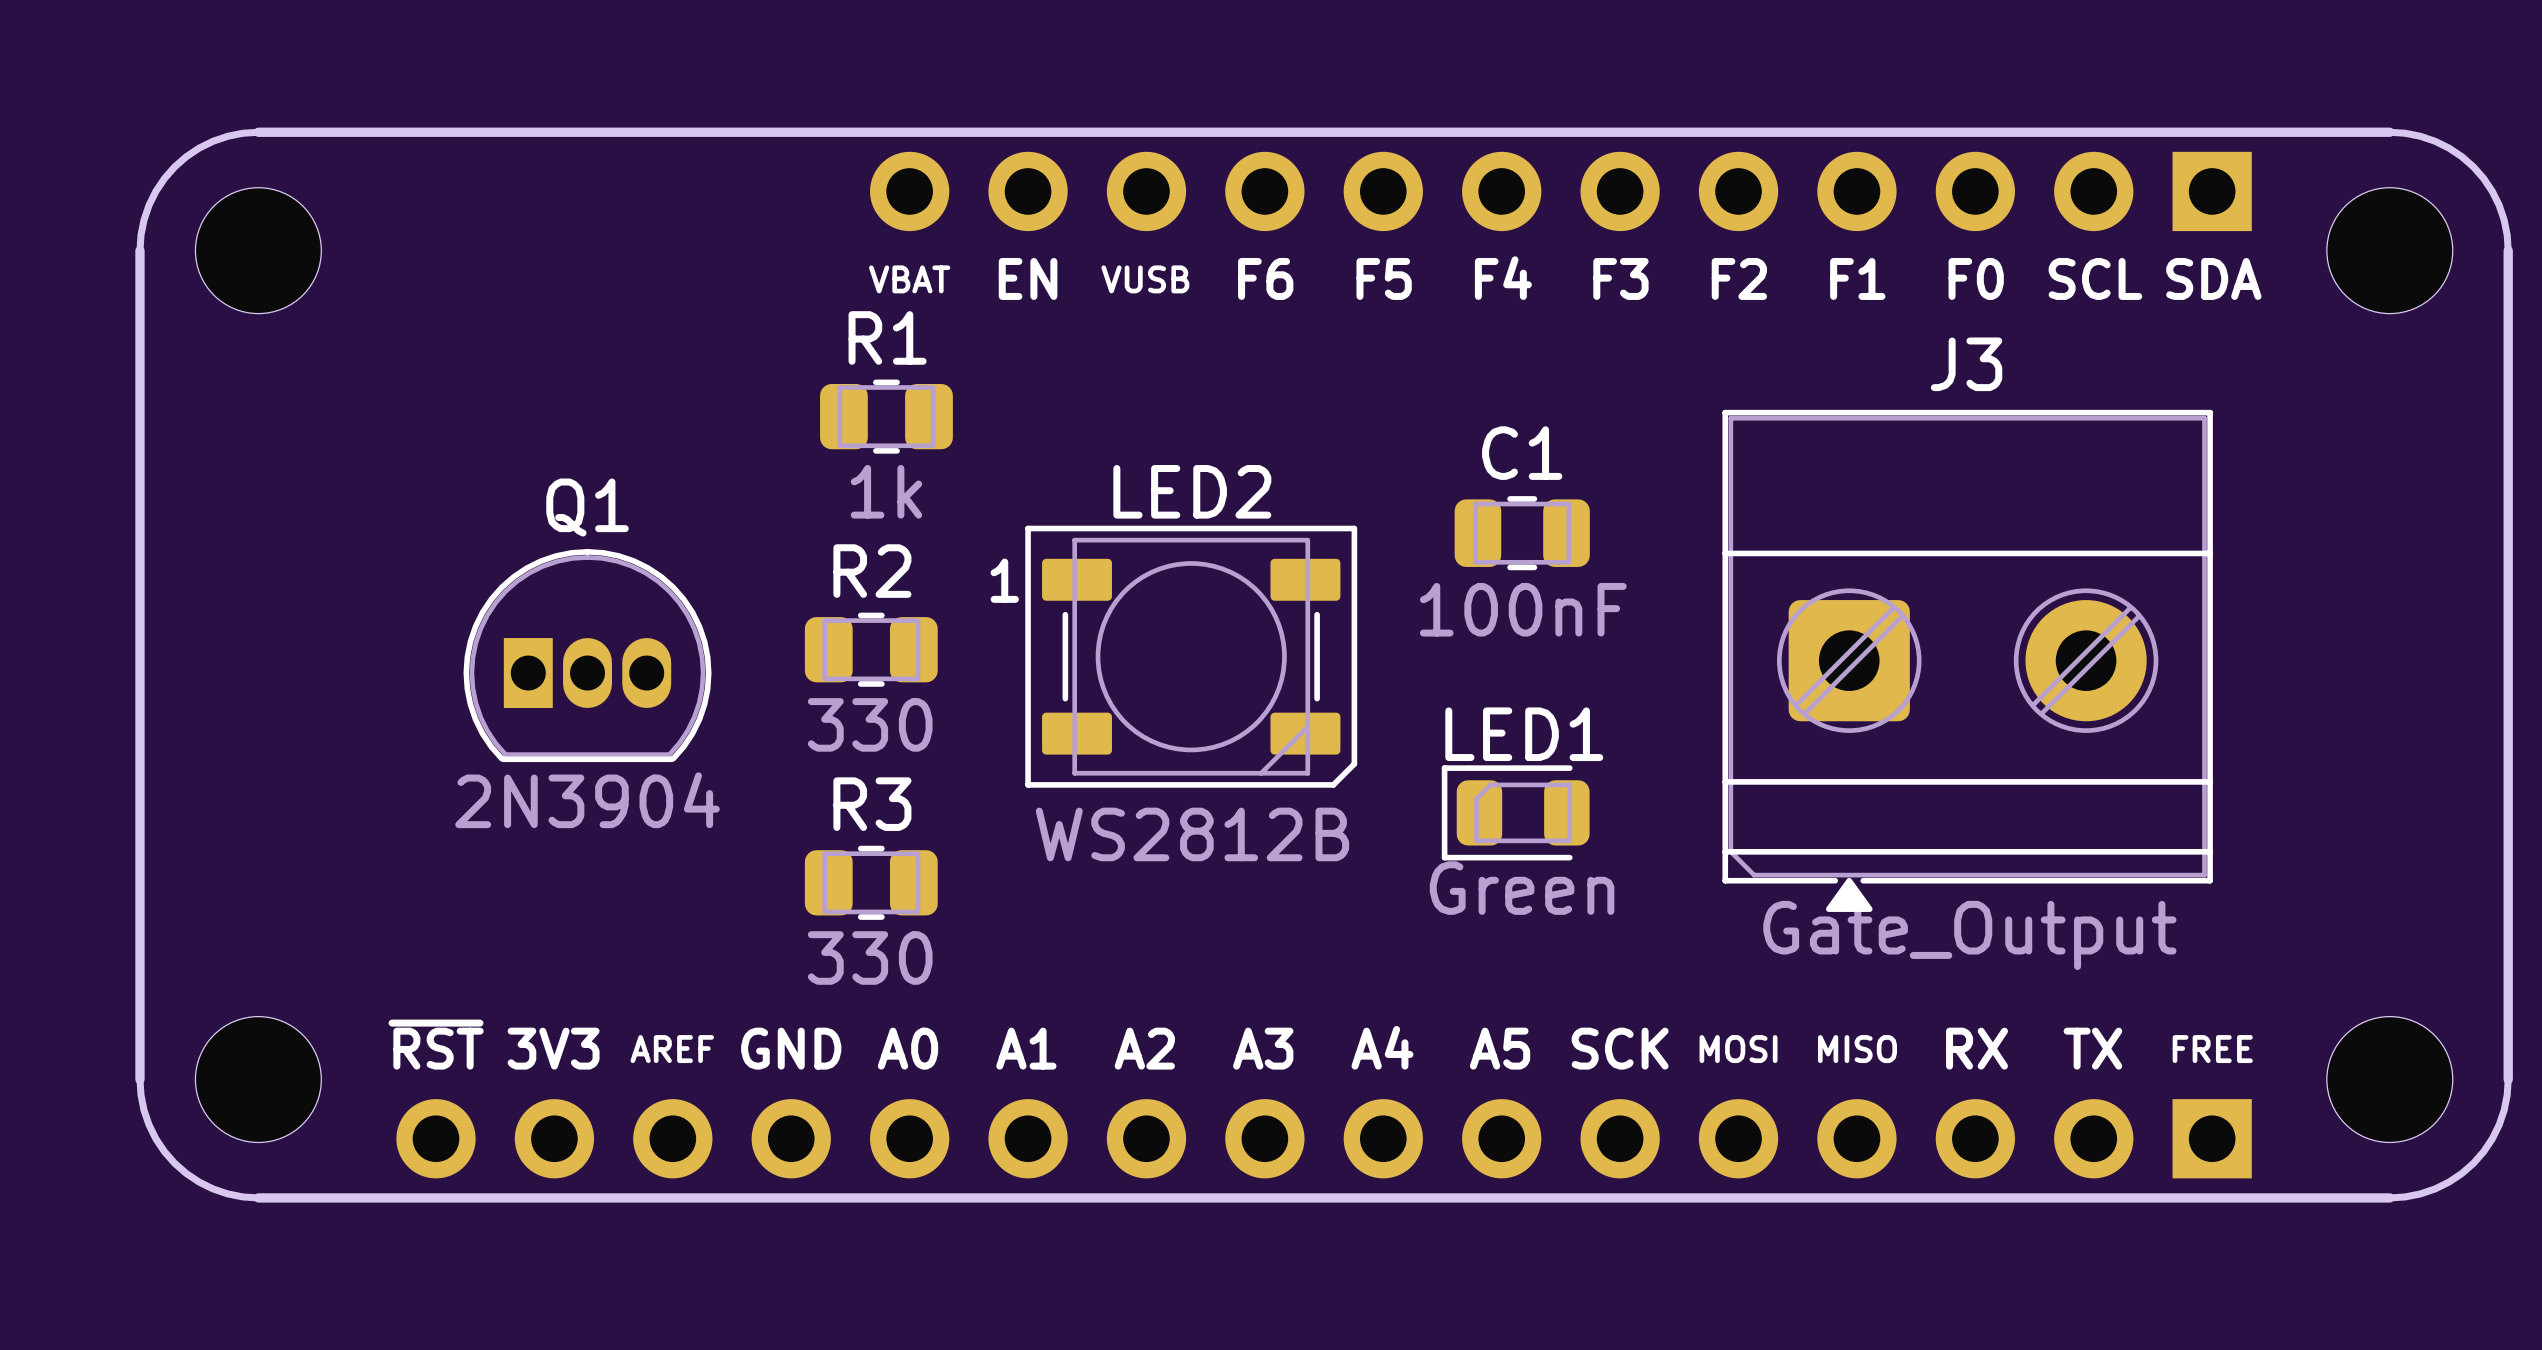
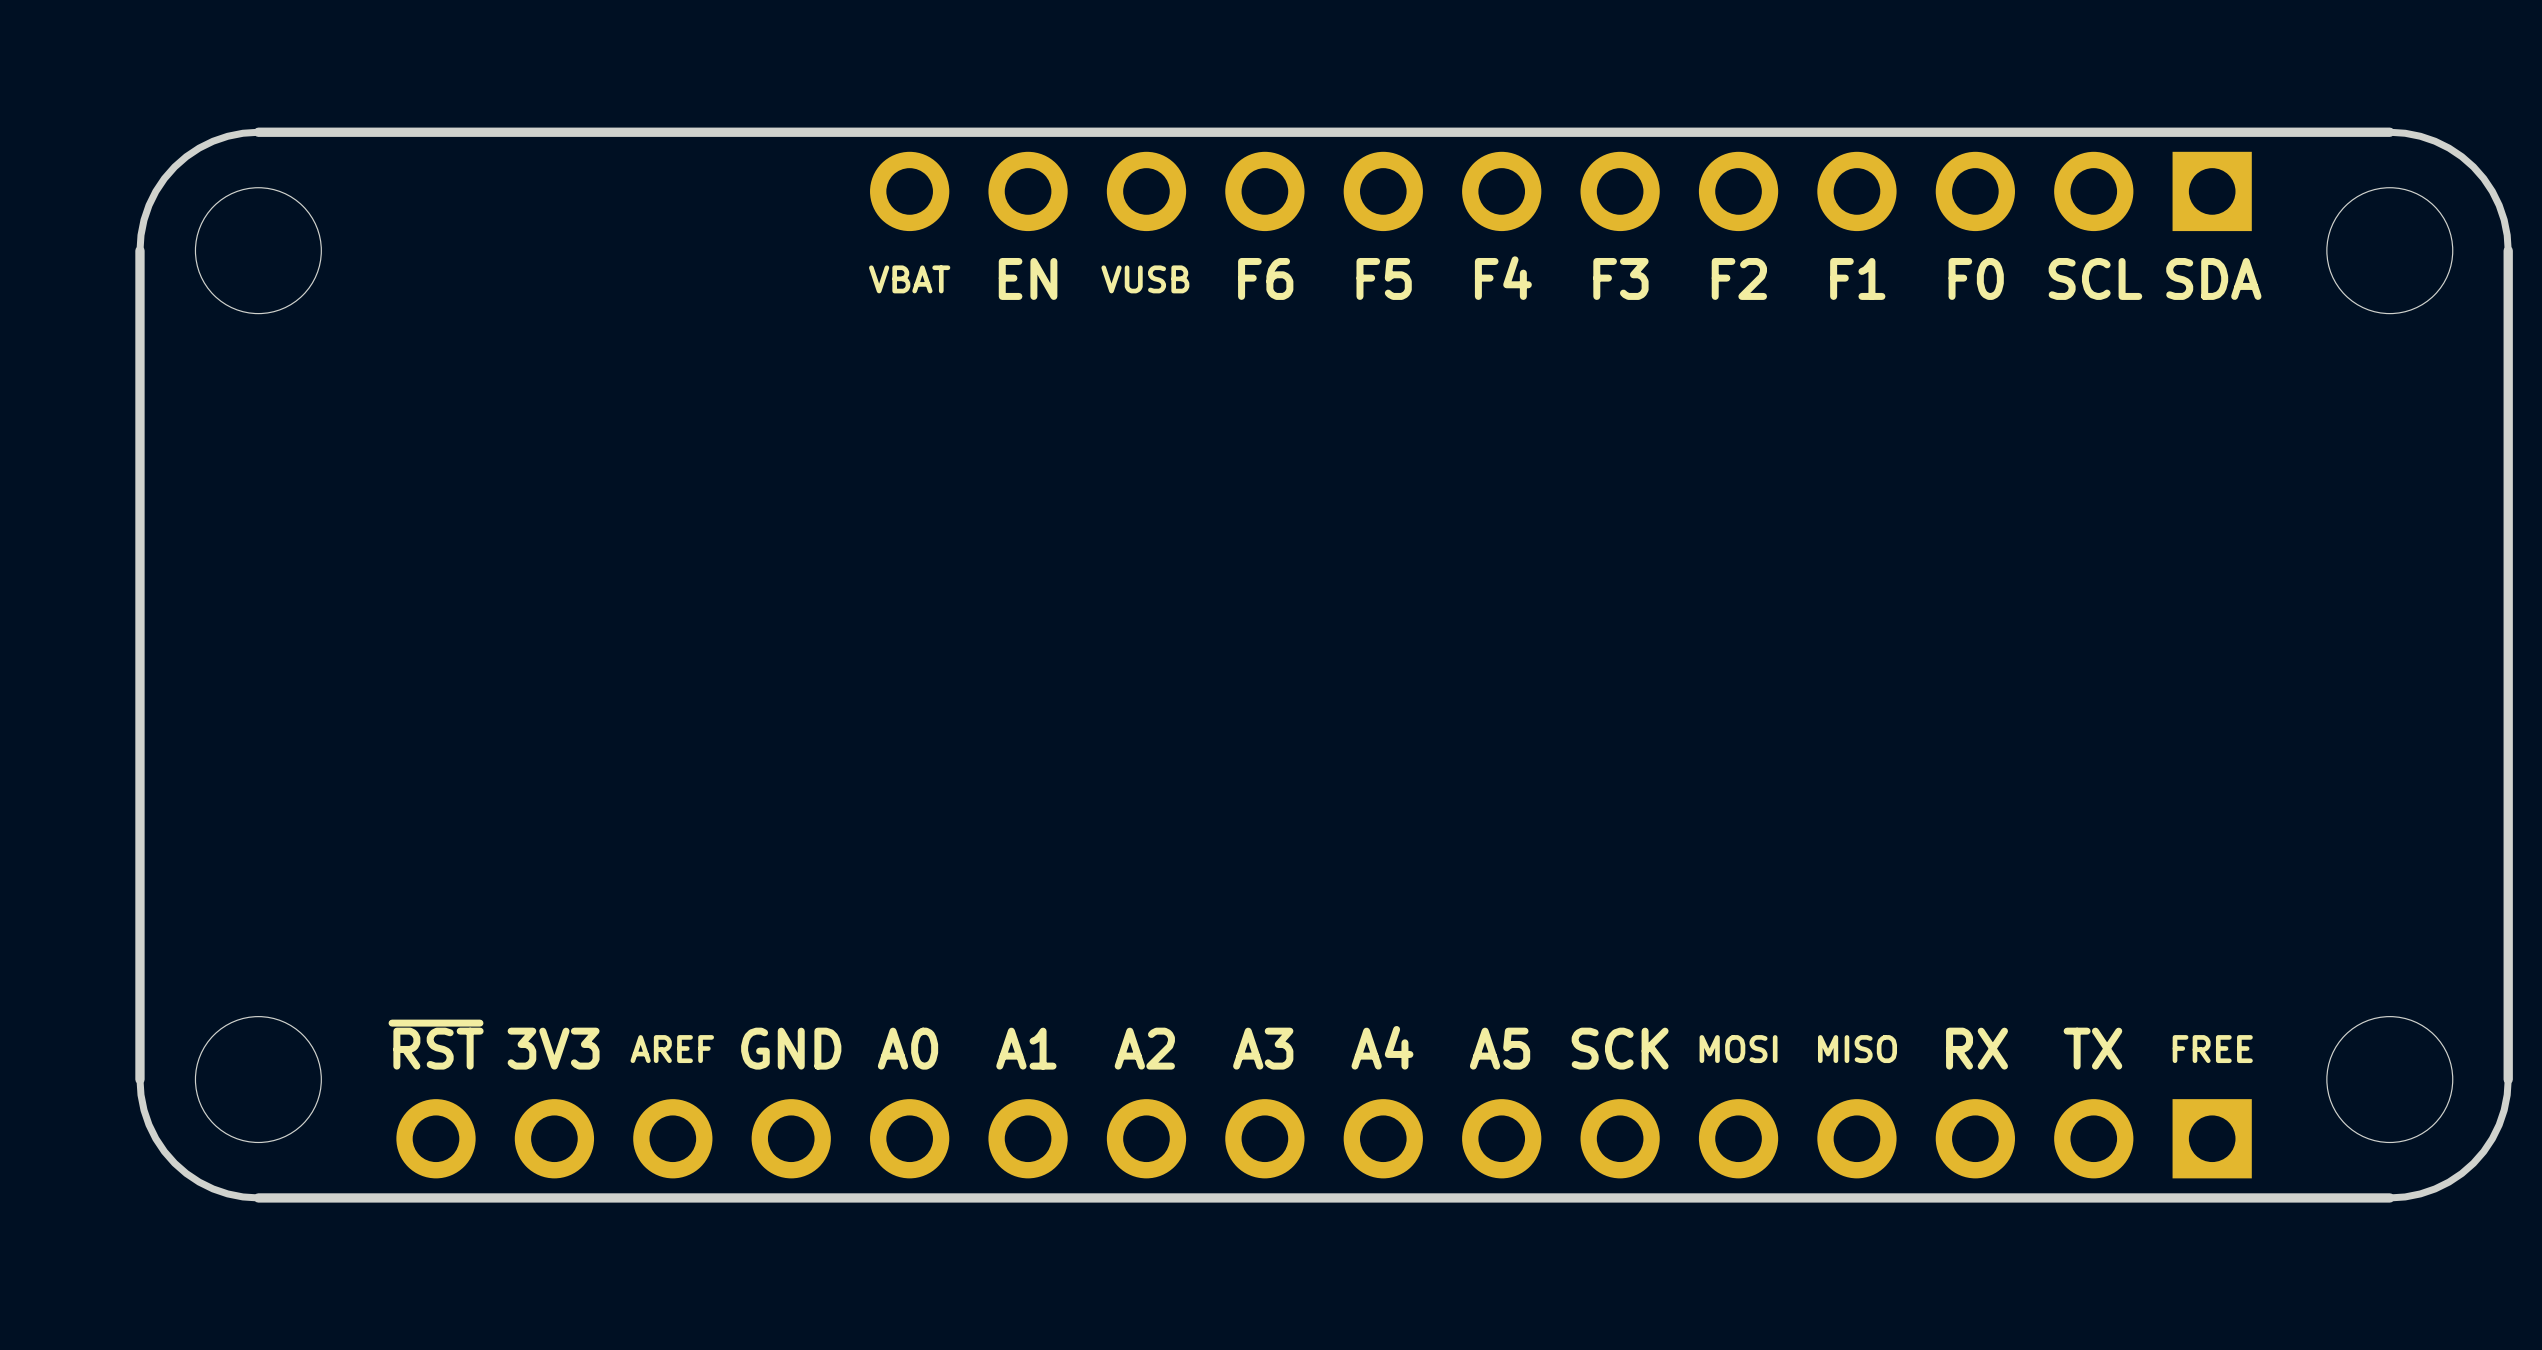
R1: 1k (886, 416) -> none
C1: 100nF (1522, 533) -> none
R2: 330 (871, 649) -> none
Q1: 2N3904 (587, 655) -> none
LED2: WS2812B (1191, 656) -> none
J3: Gate_Output (1967, 660) -> none
LED1: Green (1515, 812) -> none
R3: 330 (871, 882) -> none

